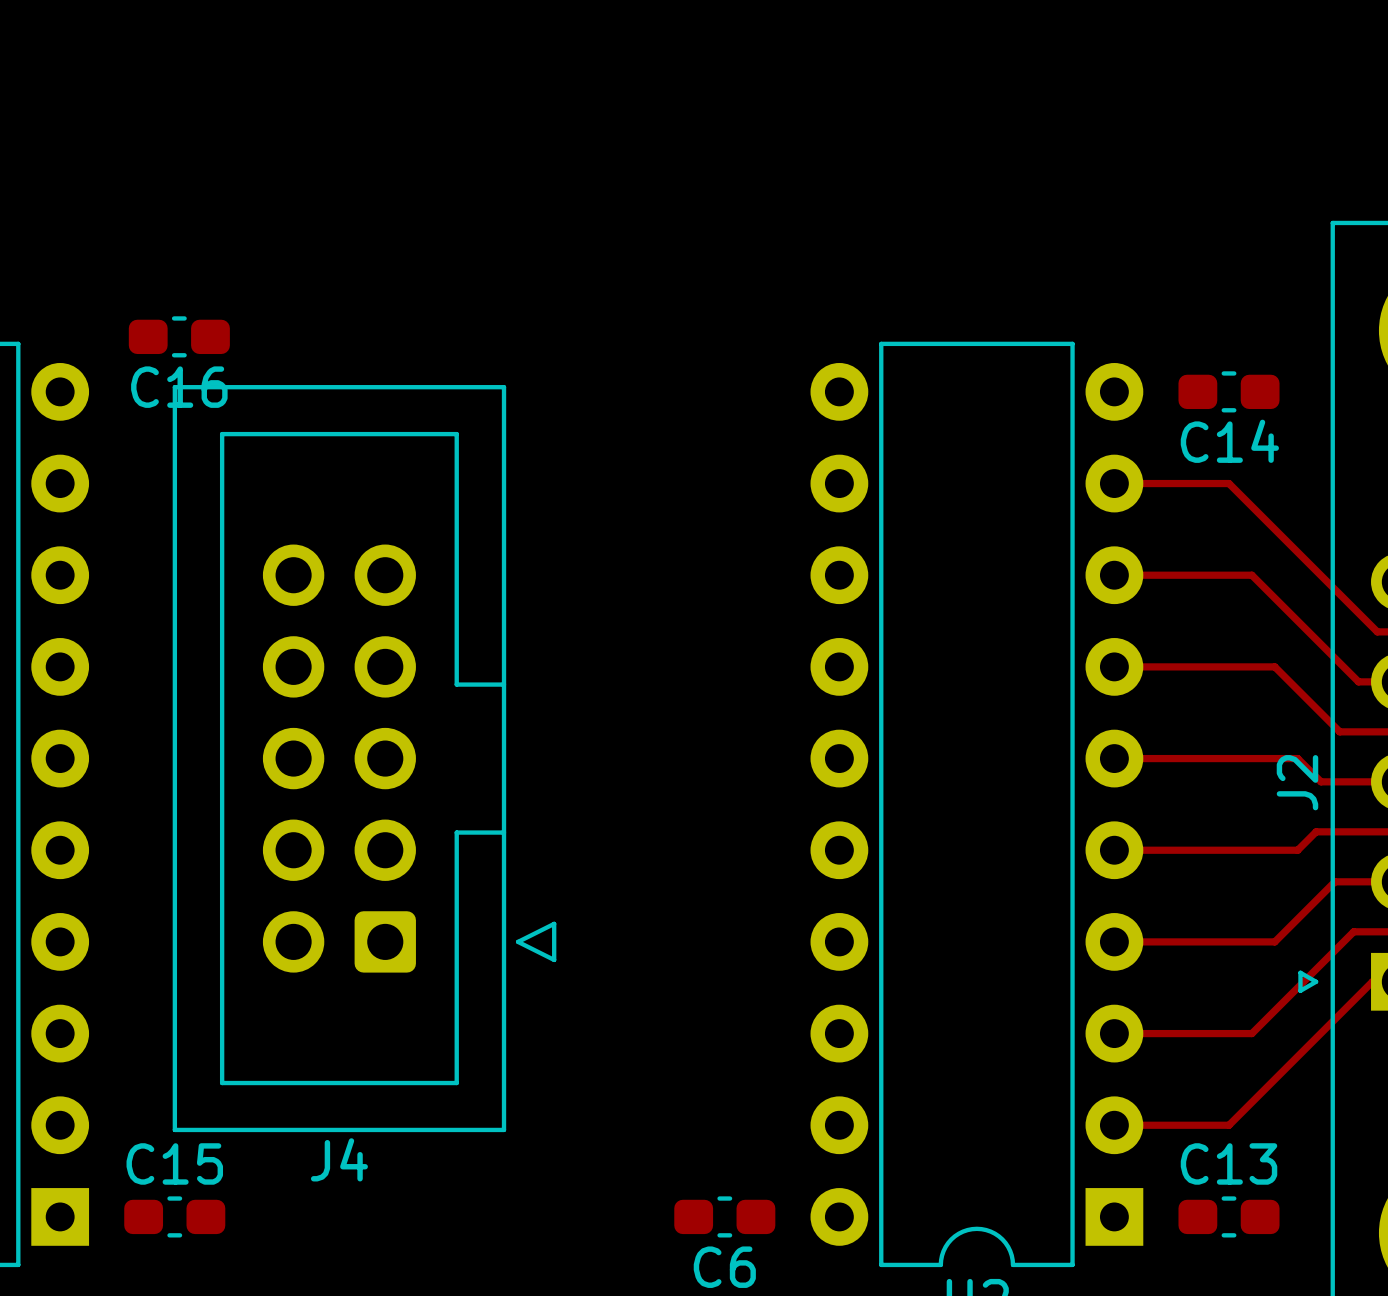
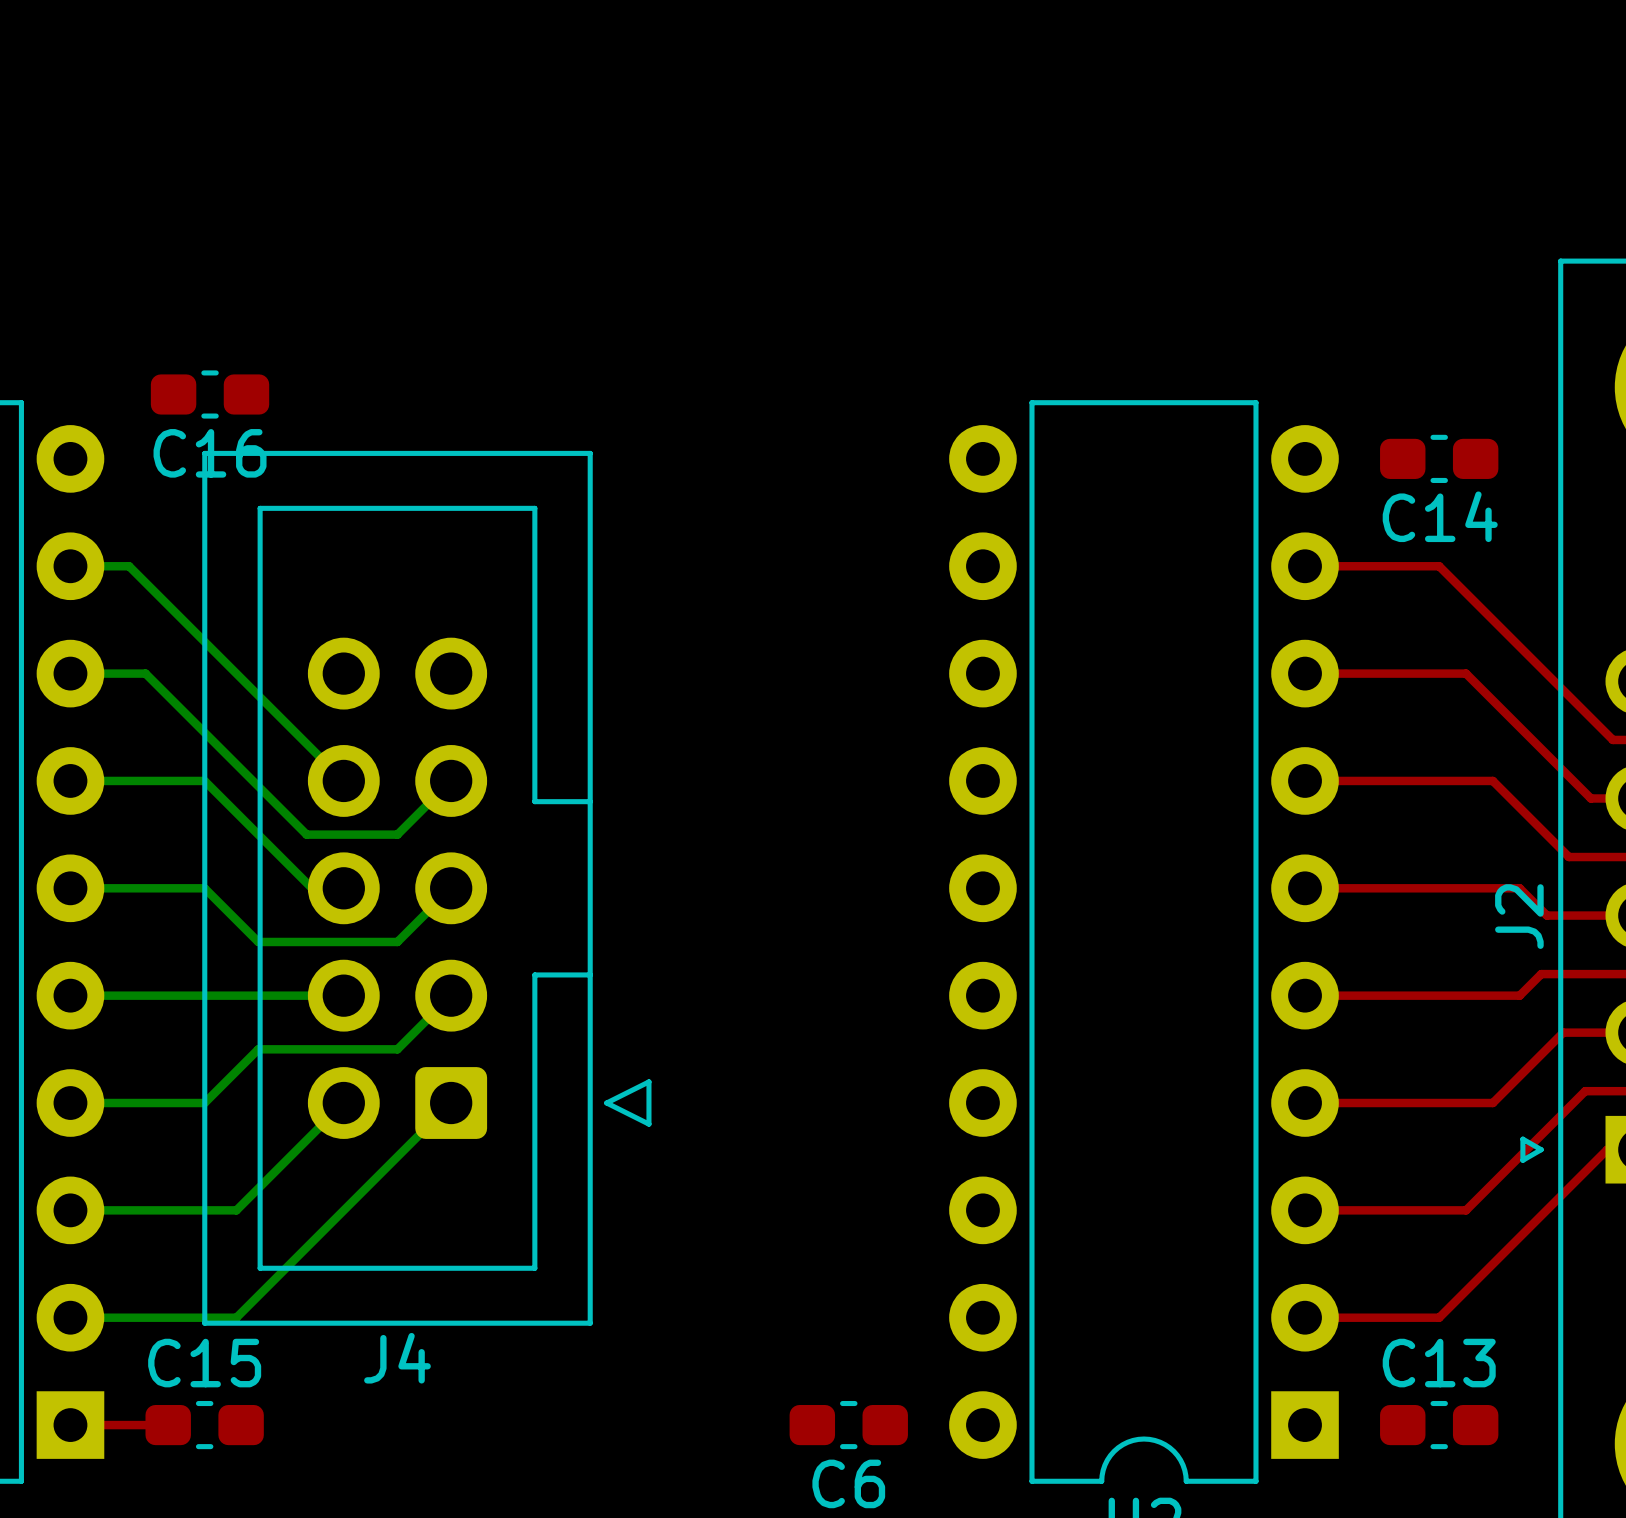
bottom track: none -> (70, 566) (129, 566) (343, 780)
bottom track: none -> (70, 673) (145, 673) (306, 834) (397, 834) (451, 780)
bottom track: none -> (70, 780) (204, 780) (312, 888) (343, 888)
bottom track: none -> (70, 888) (204, 888) (258, 941) (397, 941) (451, 888)
bottom track: none -> (70, 995) (343, 995)
bottom track: none -> (451, 995) (397, 1049) (258, 1049) (204, 1103) (70, 1103)
bottom track: none -> (343, 1103) (236, 1210) (70, 1210)
bottom track: none -> (451, 1103) (236, 1317) (70, 1317)
top track: none -> (70, 1425) (168, 1425)

